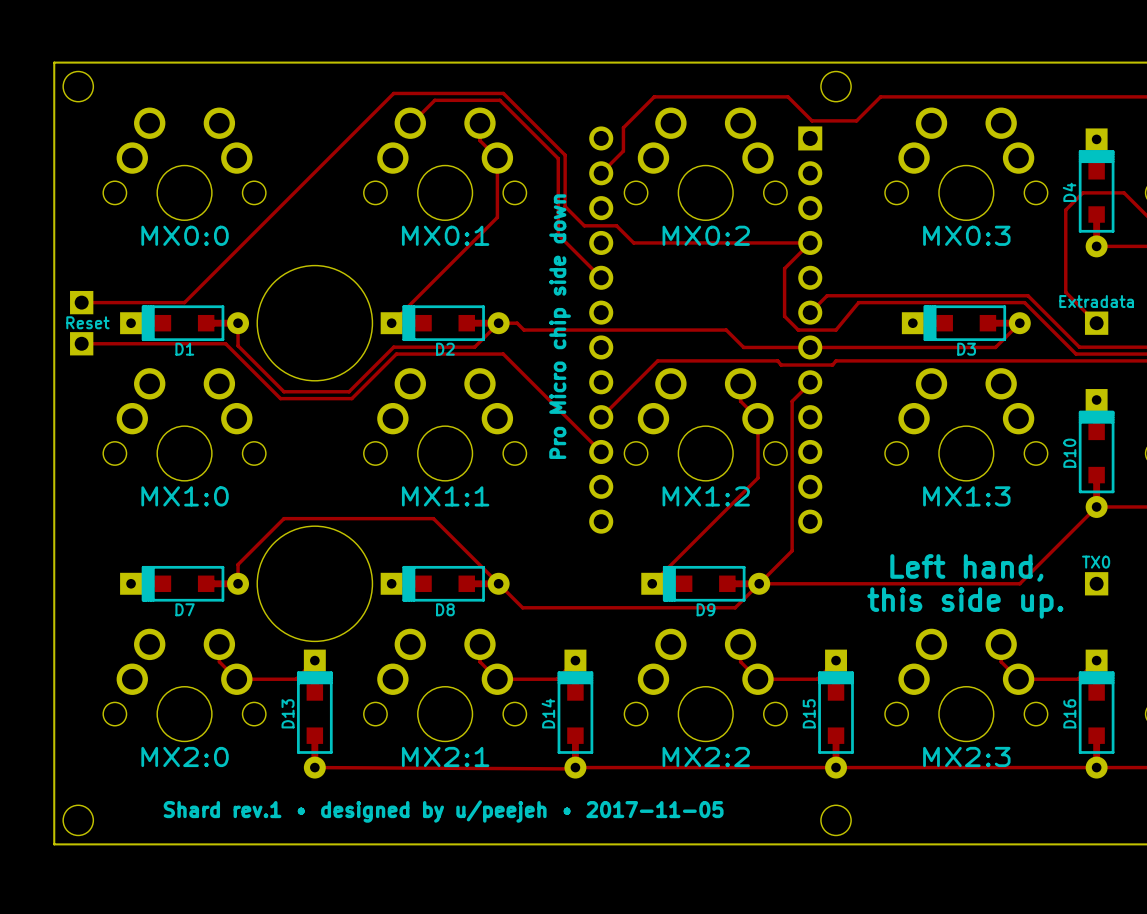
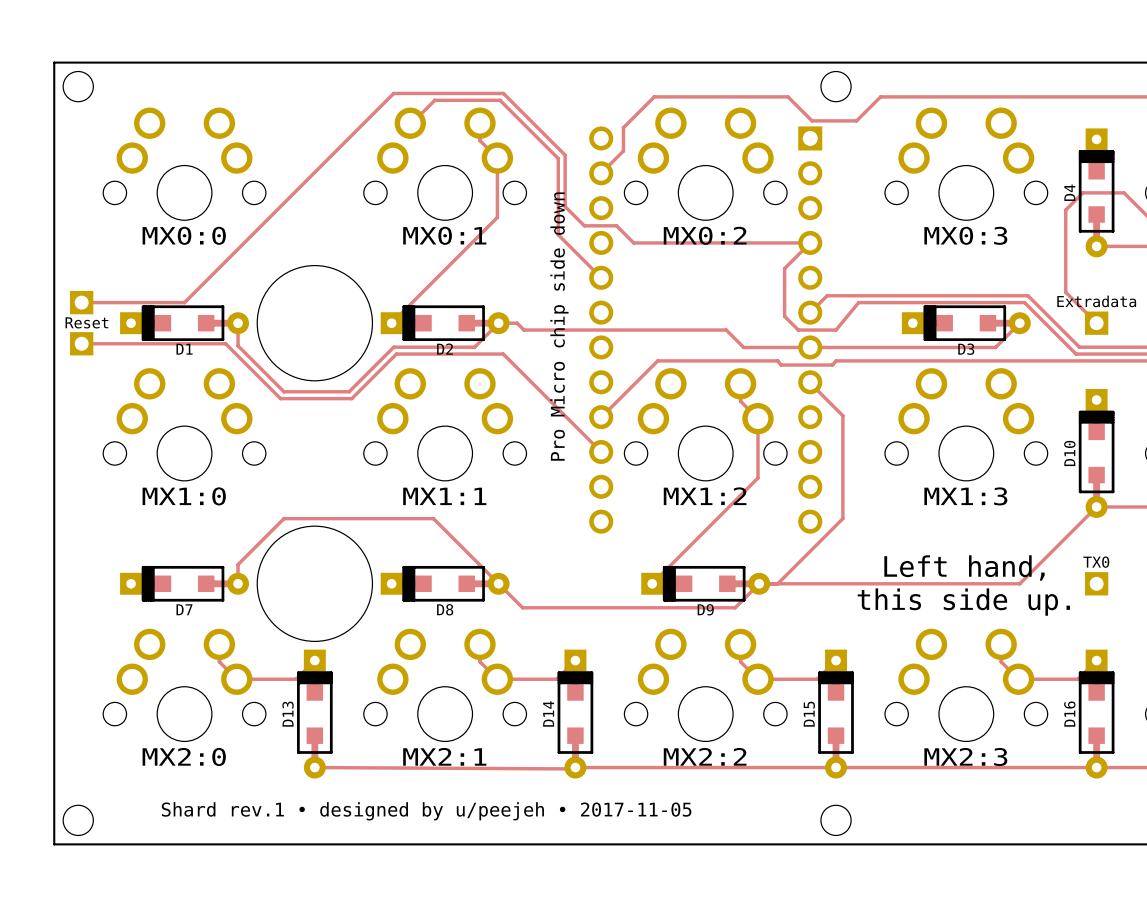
track: (810, 383) (792, 401) (792, 550) (759, 583) -> (810, 383) (842, 415) (842, 518) (777, 583)

